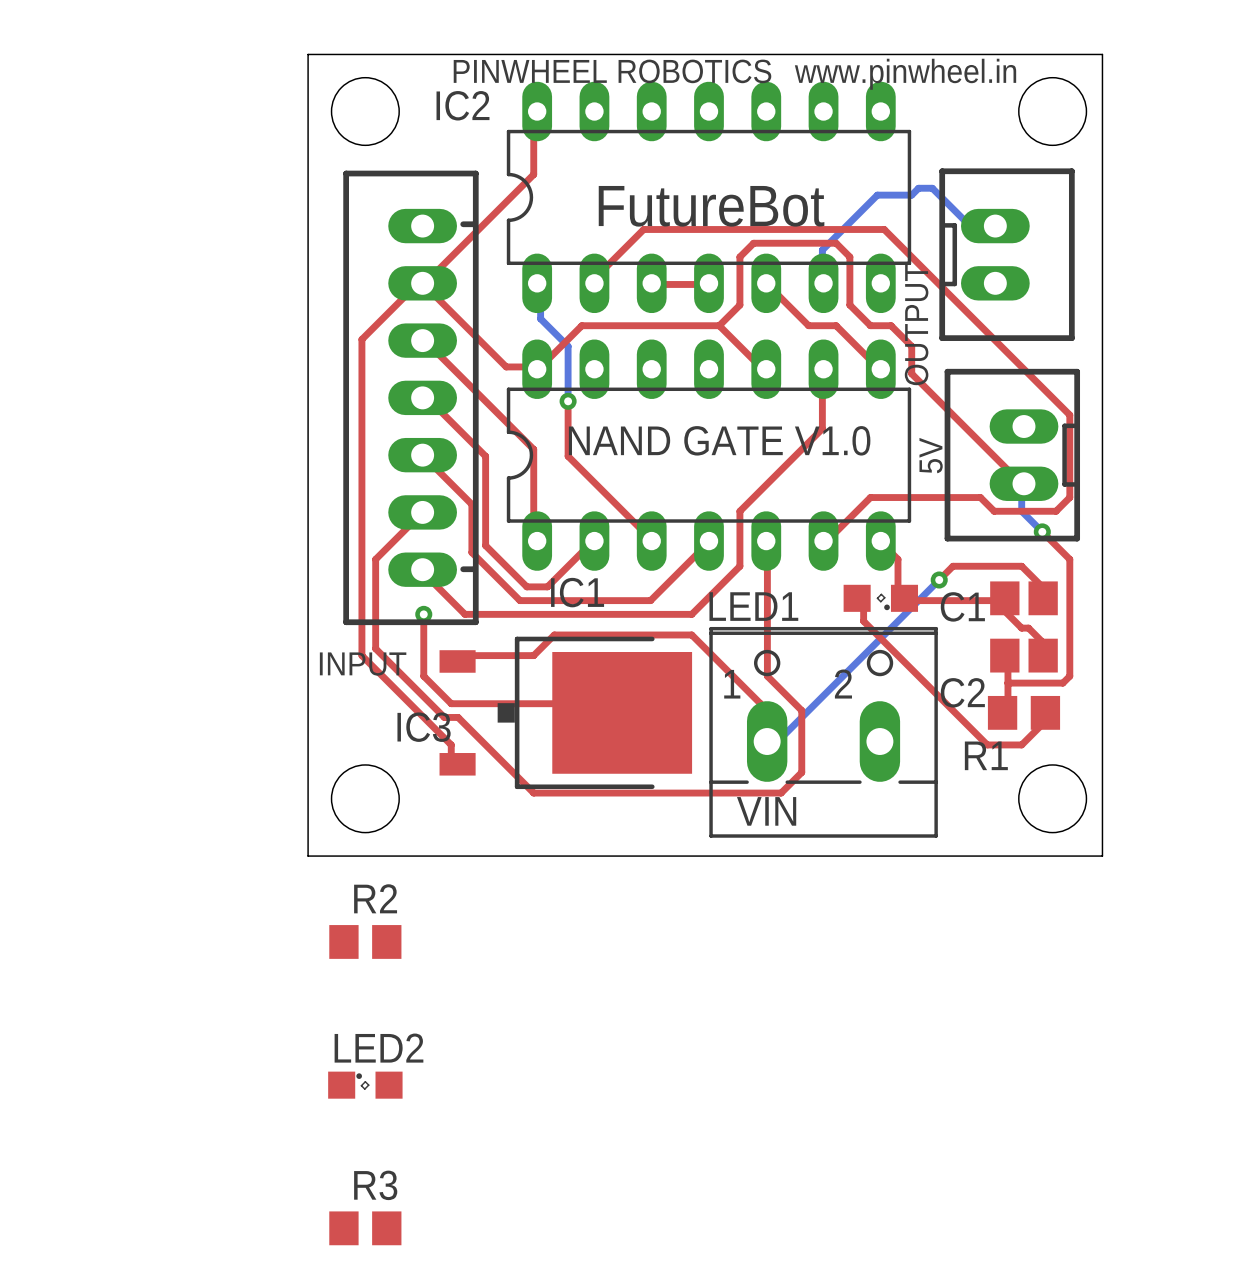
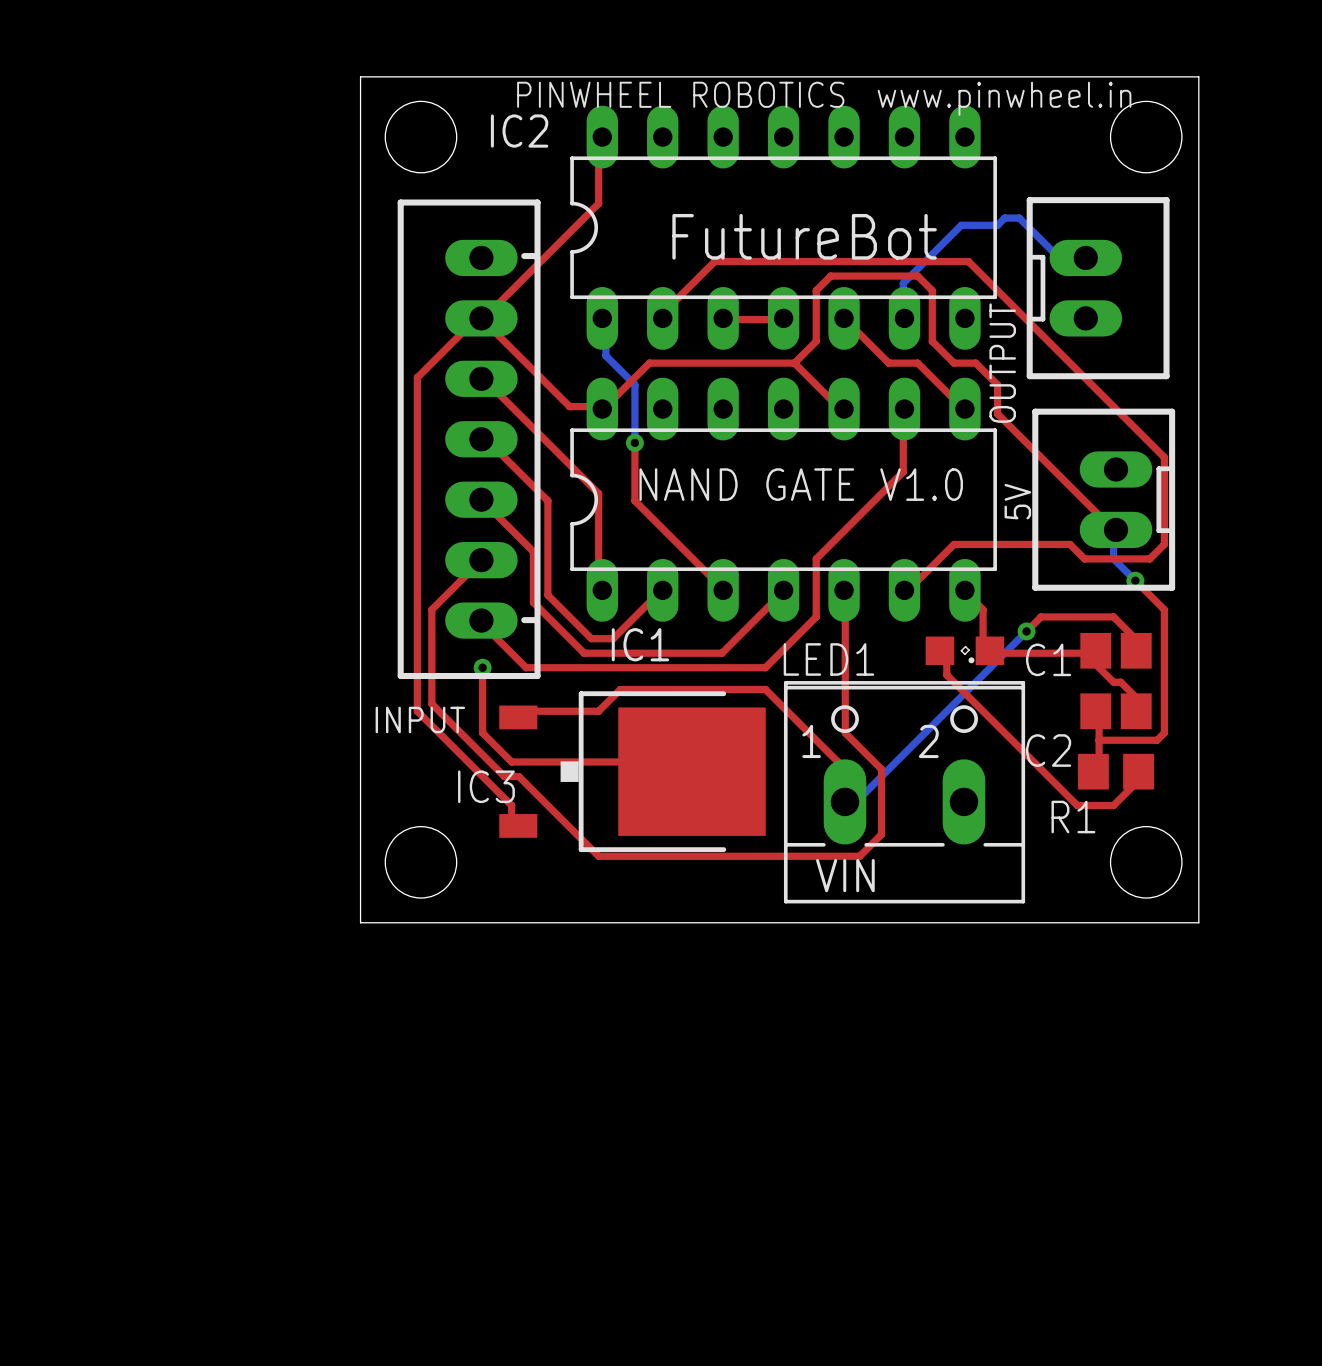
R2: (365, 941) -> none
LED2: (365, 1085) -> none
R3: (365, 1228) -> none

